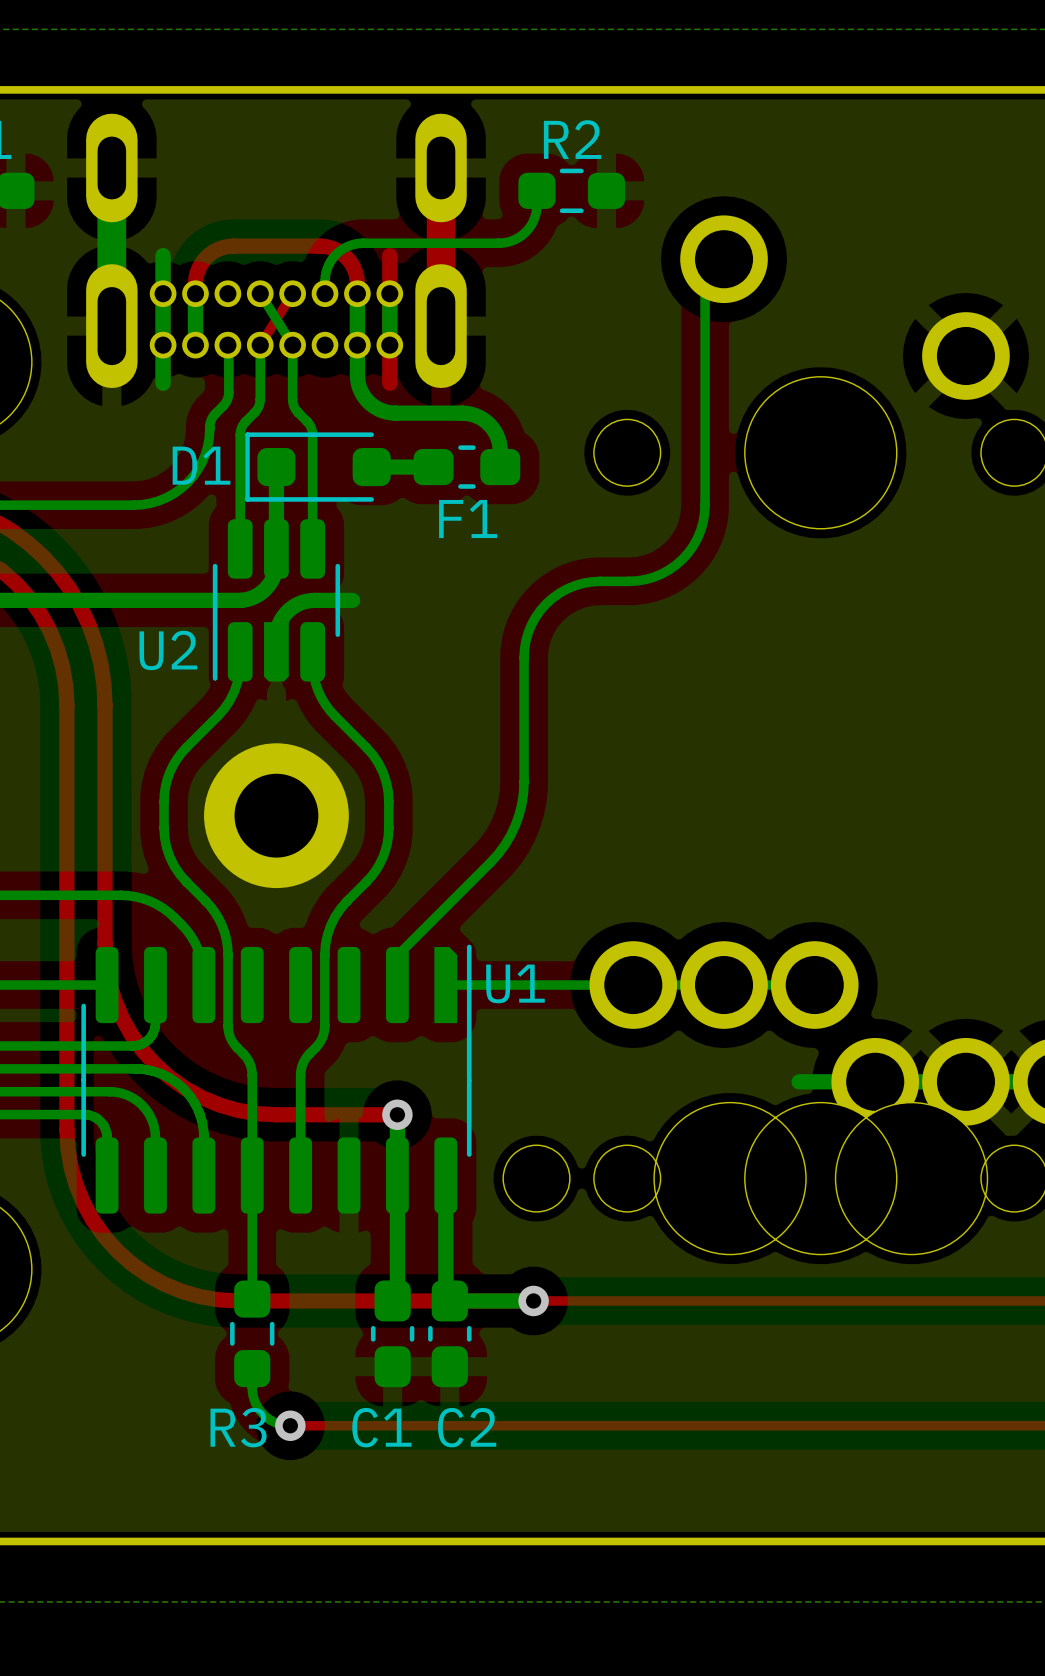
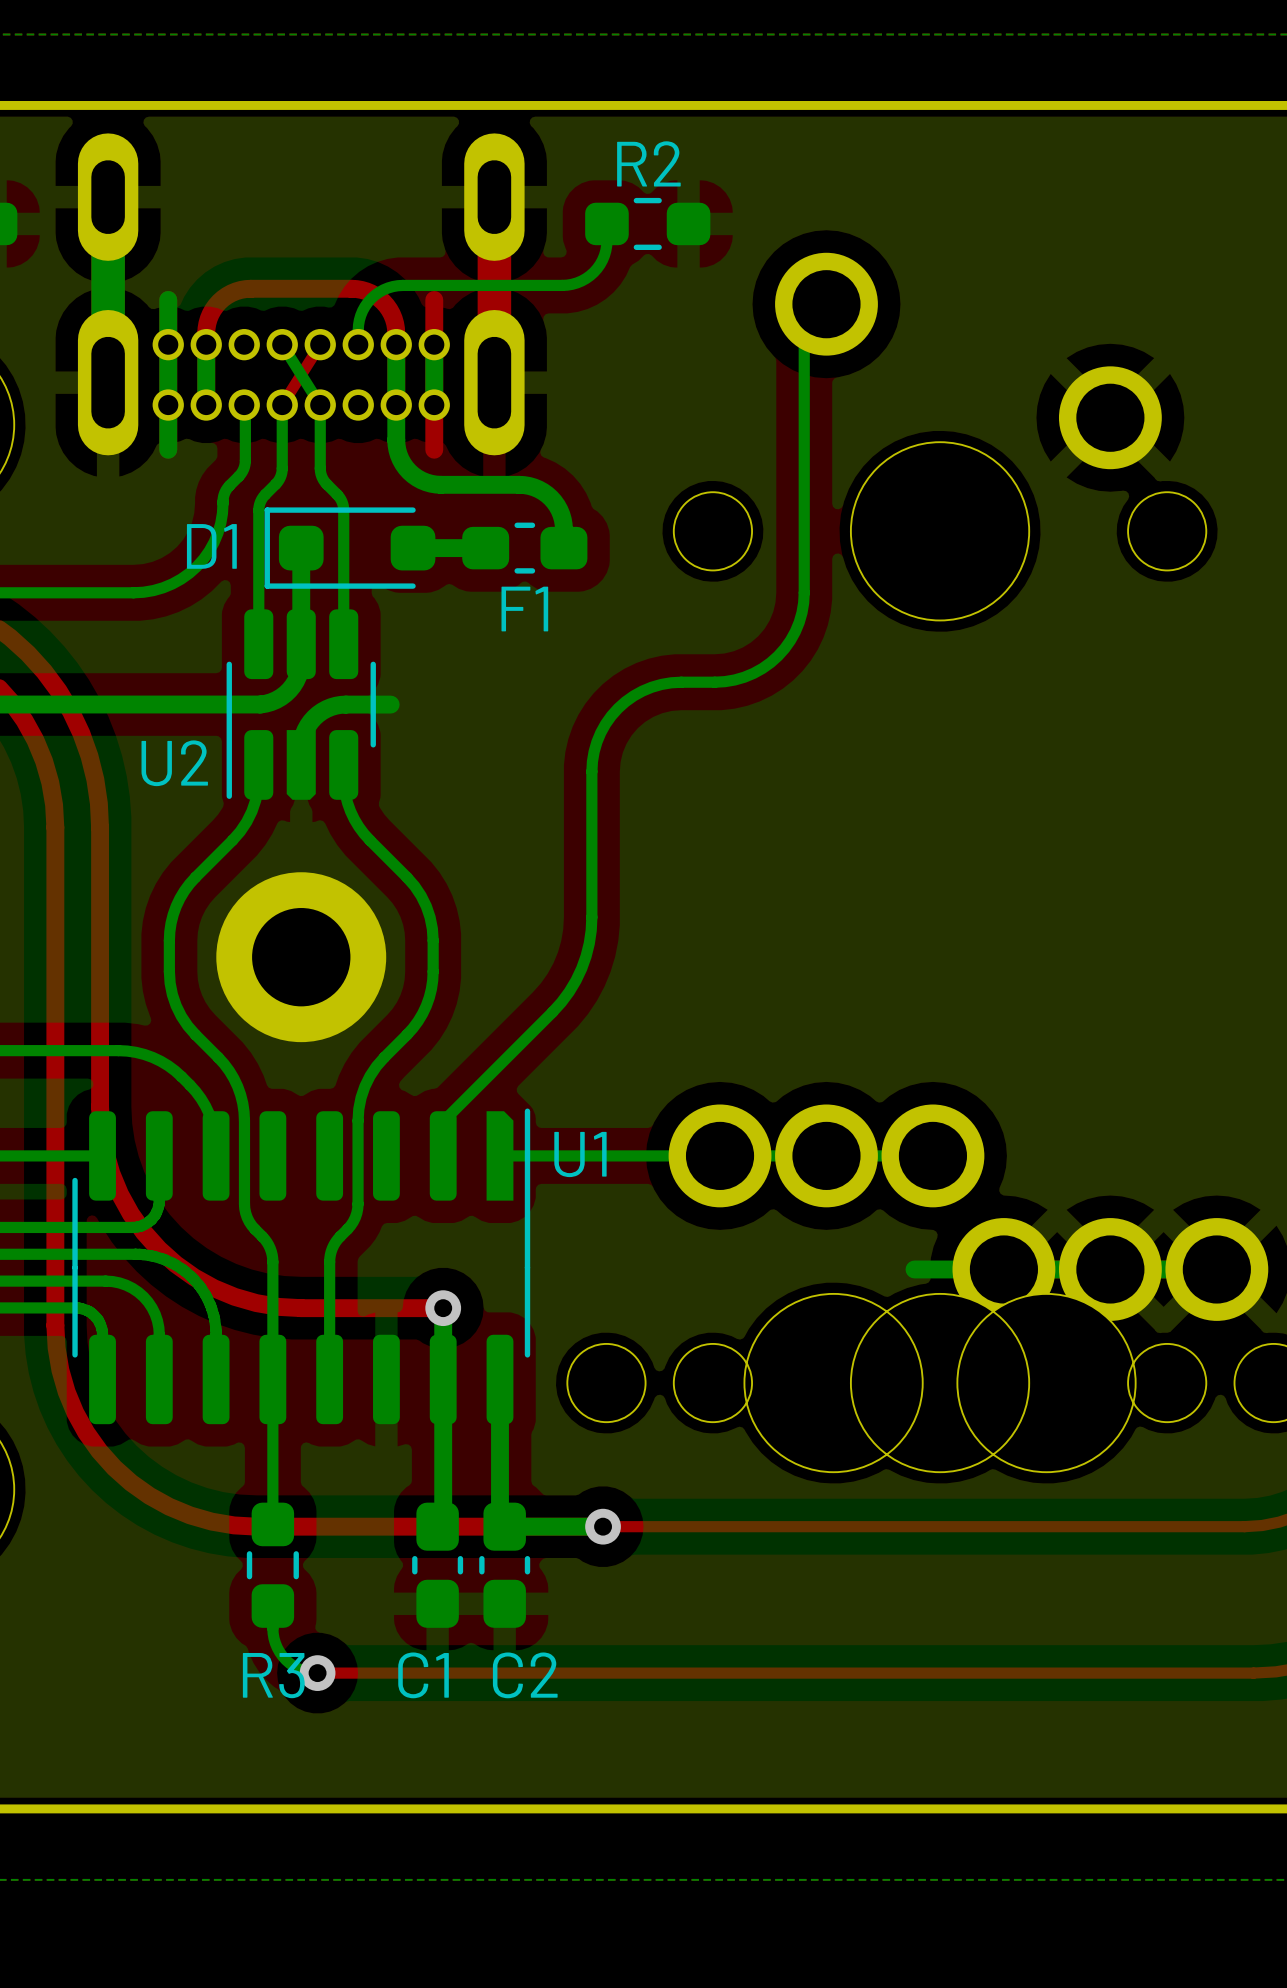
R3 name position: R3 (238, 1427) -> R3 (273, 1675)

